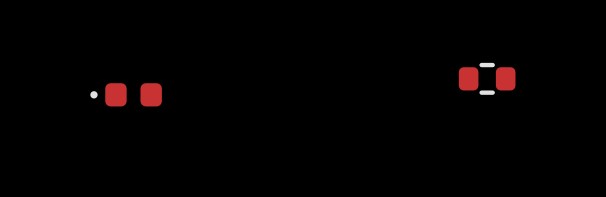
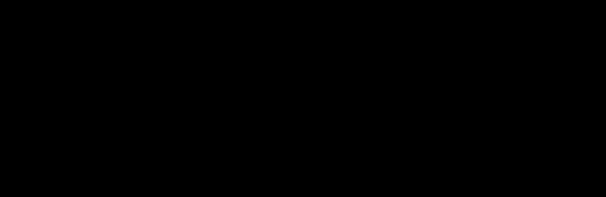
part: (487, 78) -> none
part: (126, 94) -> none

